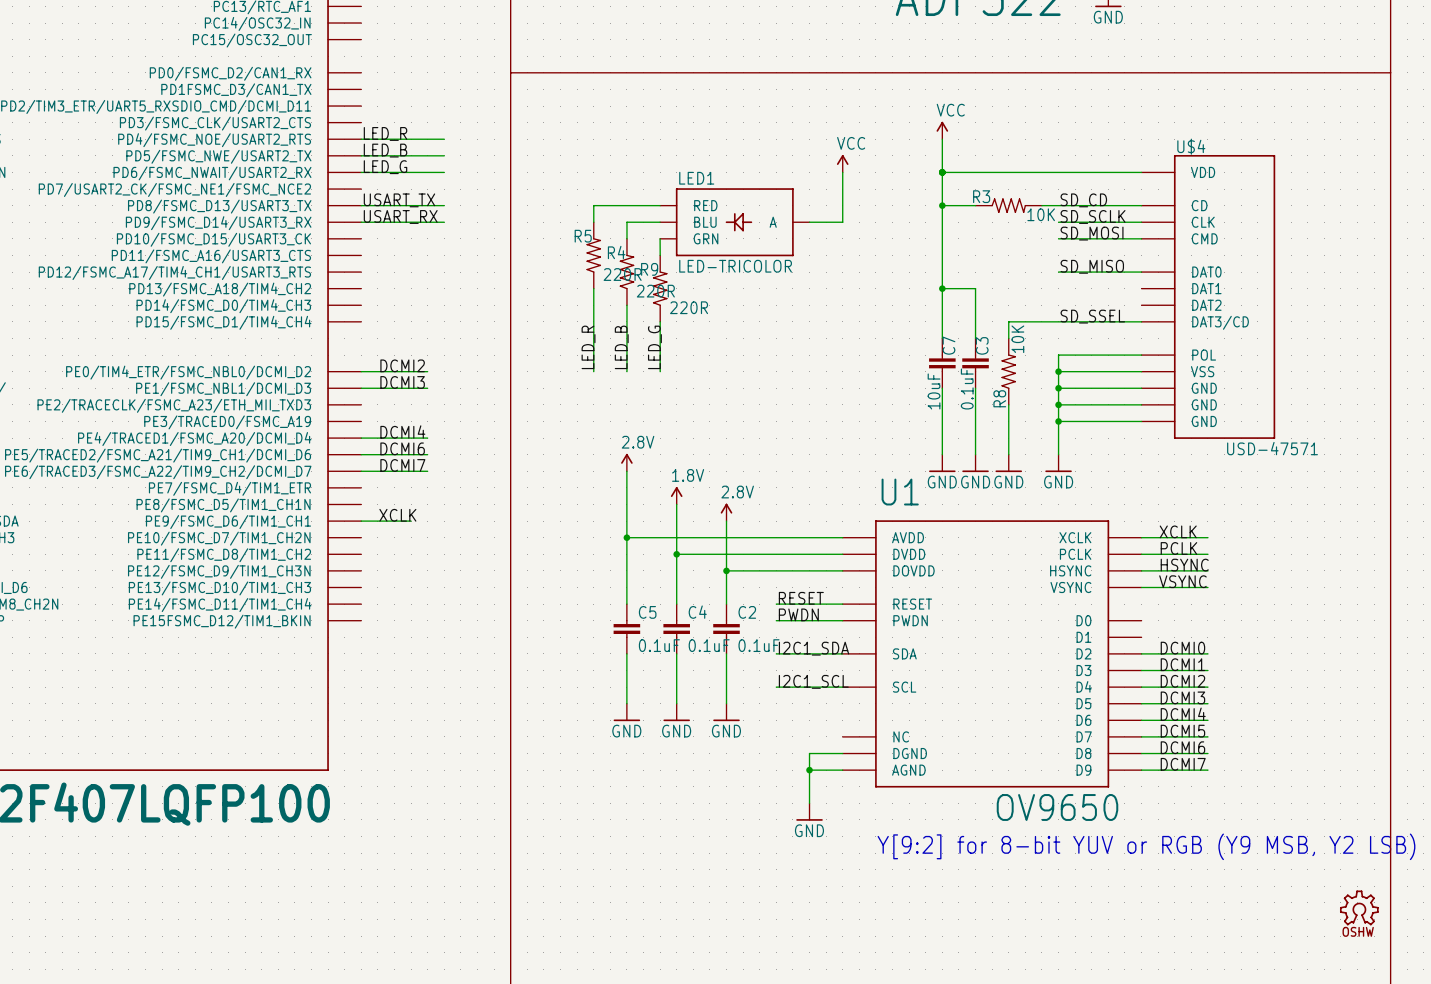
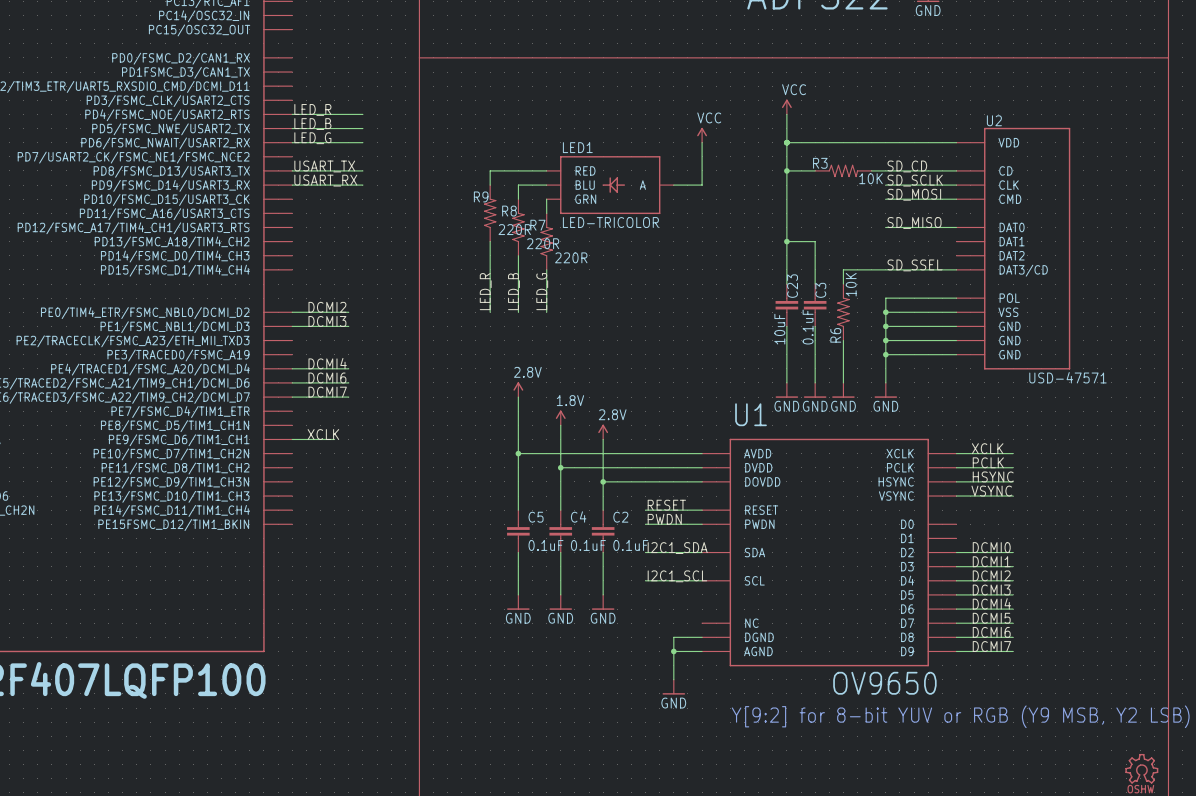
U$4 name: U$4 (1191, 146) -> U2 (994, 120)
R5 name: R5 (583, 236) -> R9 (481, 196)
R4 name: R4 (616, 252) -> R8 (509, 211)
R9 name: R9 (649, 269) -> R7 (537, 225)
C7 name: C7 (948, 345) -> C23 (792, 286)
R8 name: R8 (999, 398) -> R6 (835, 335)

